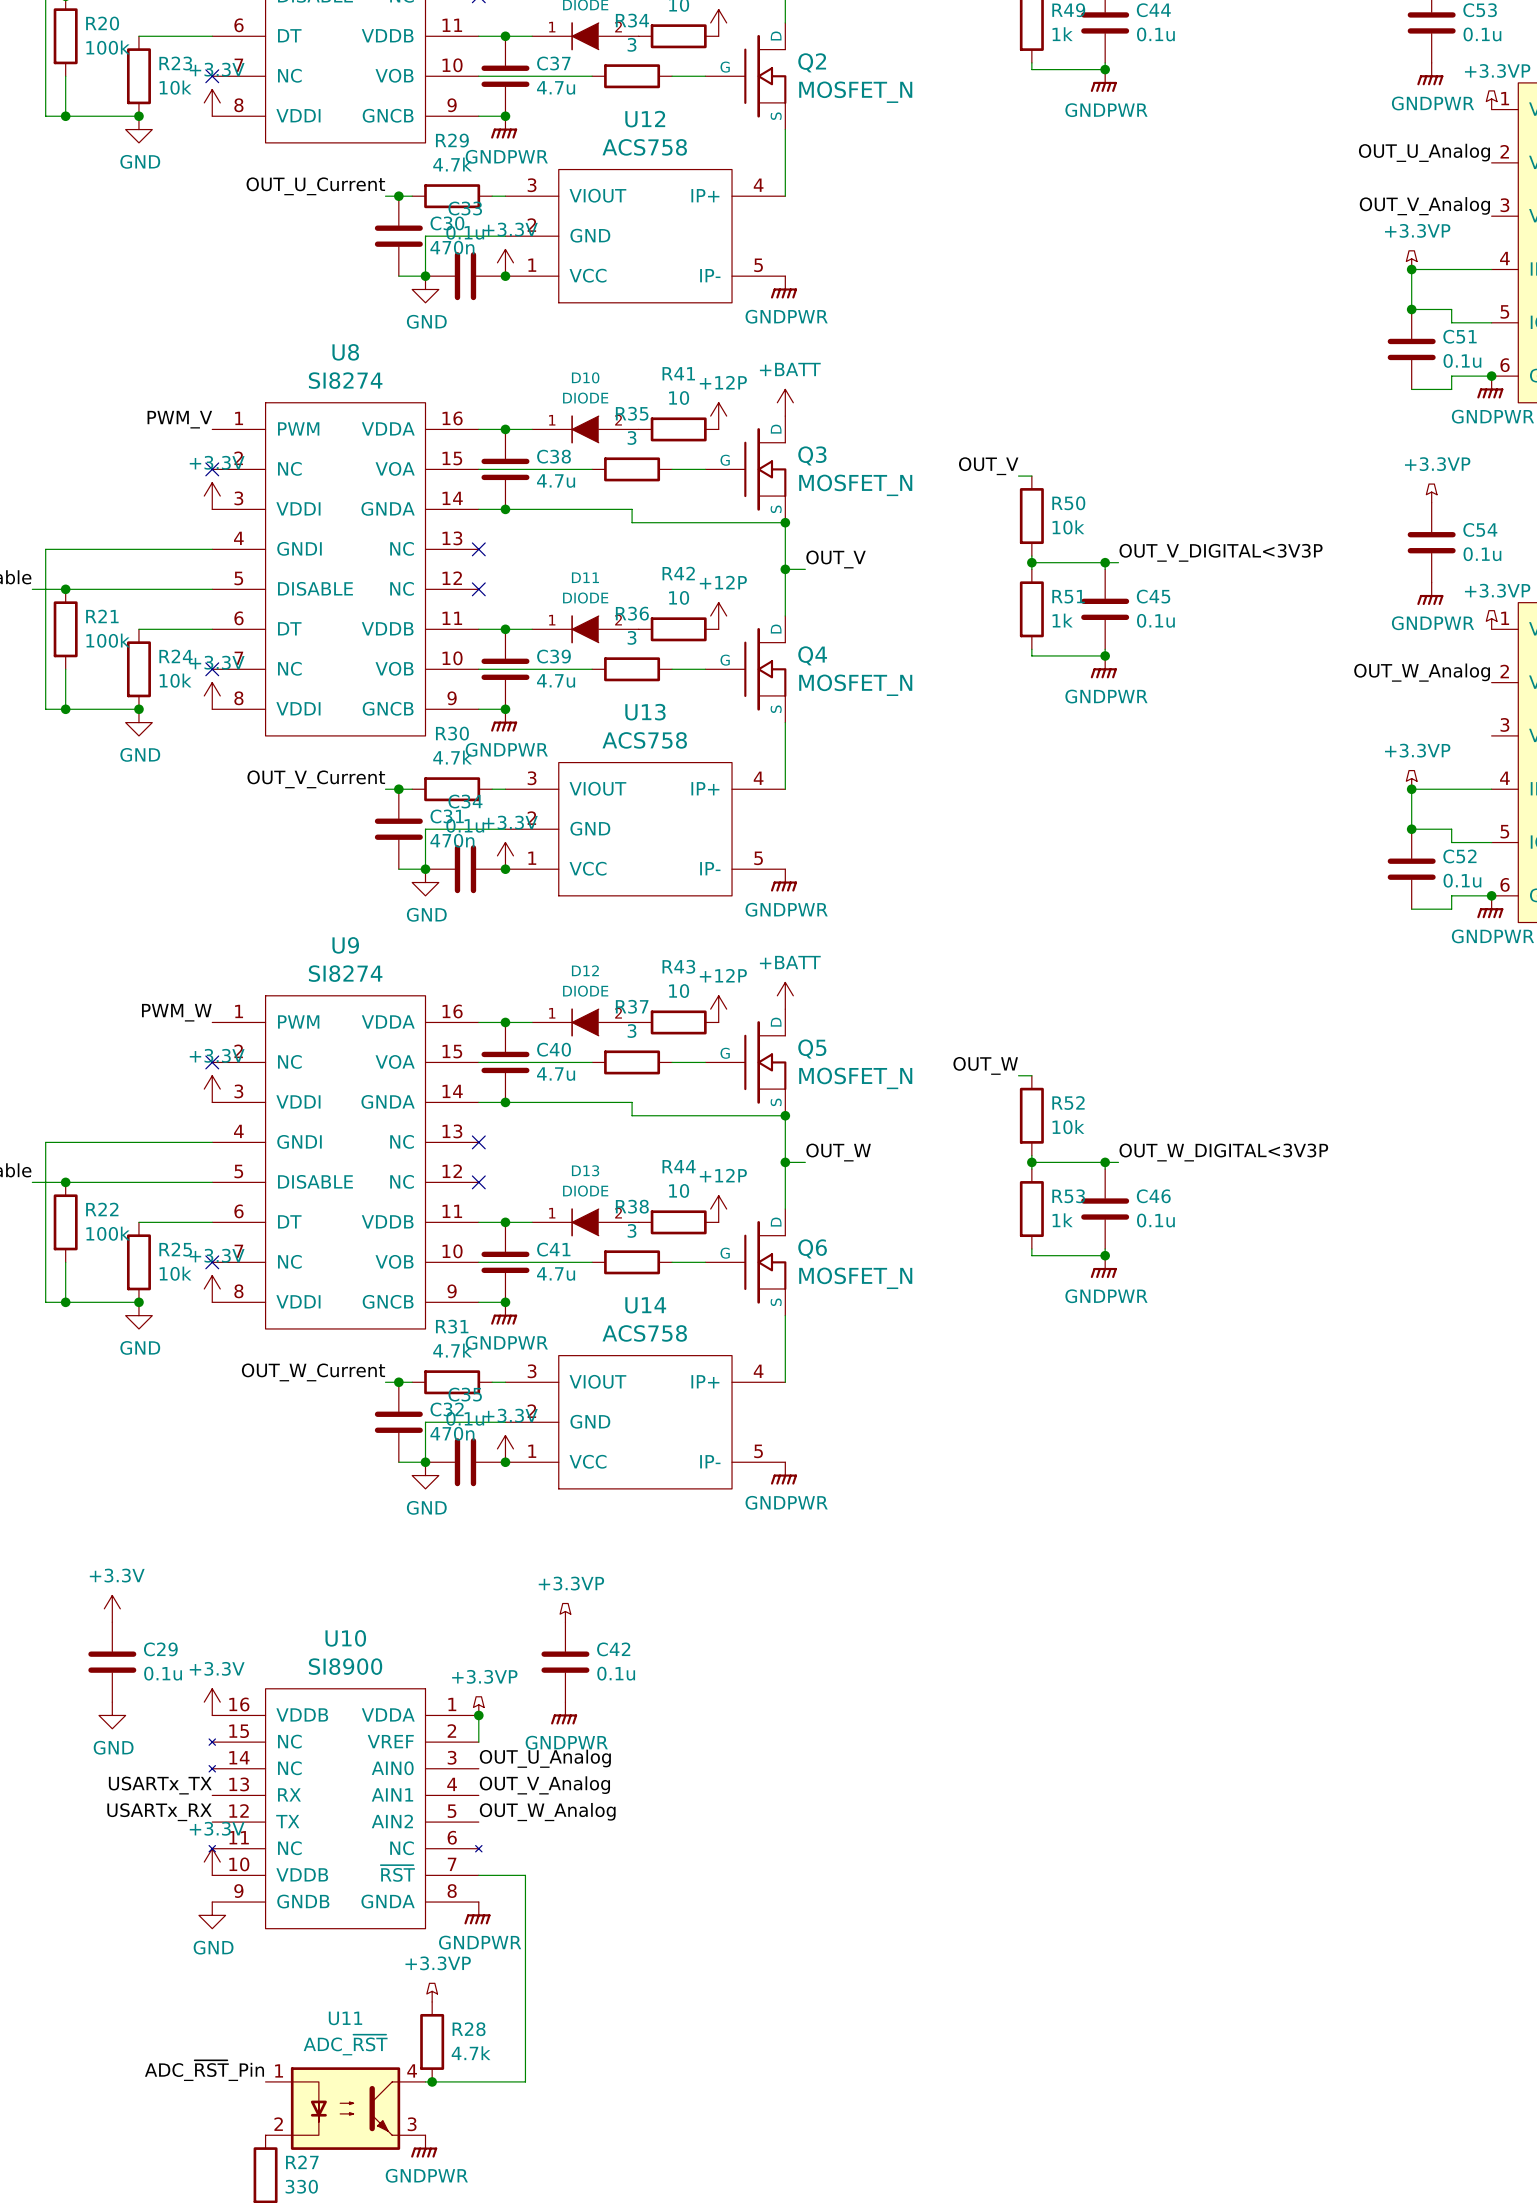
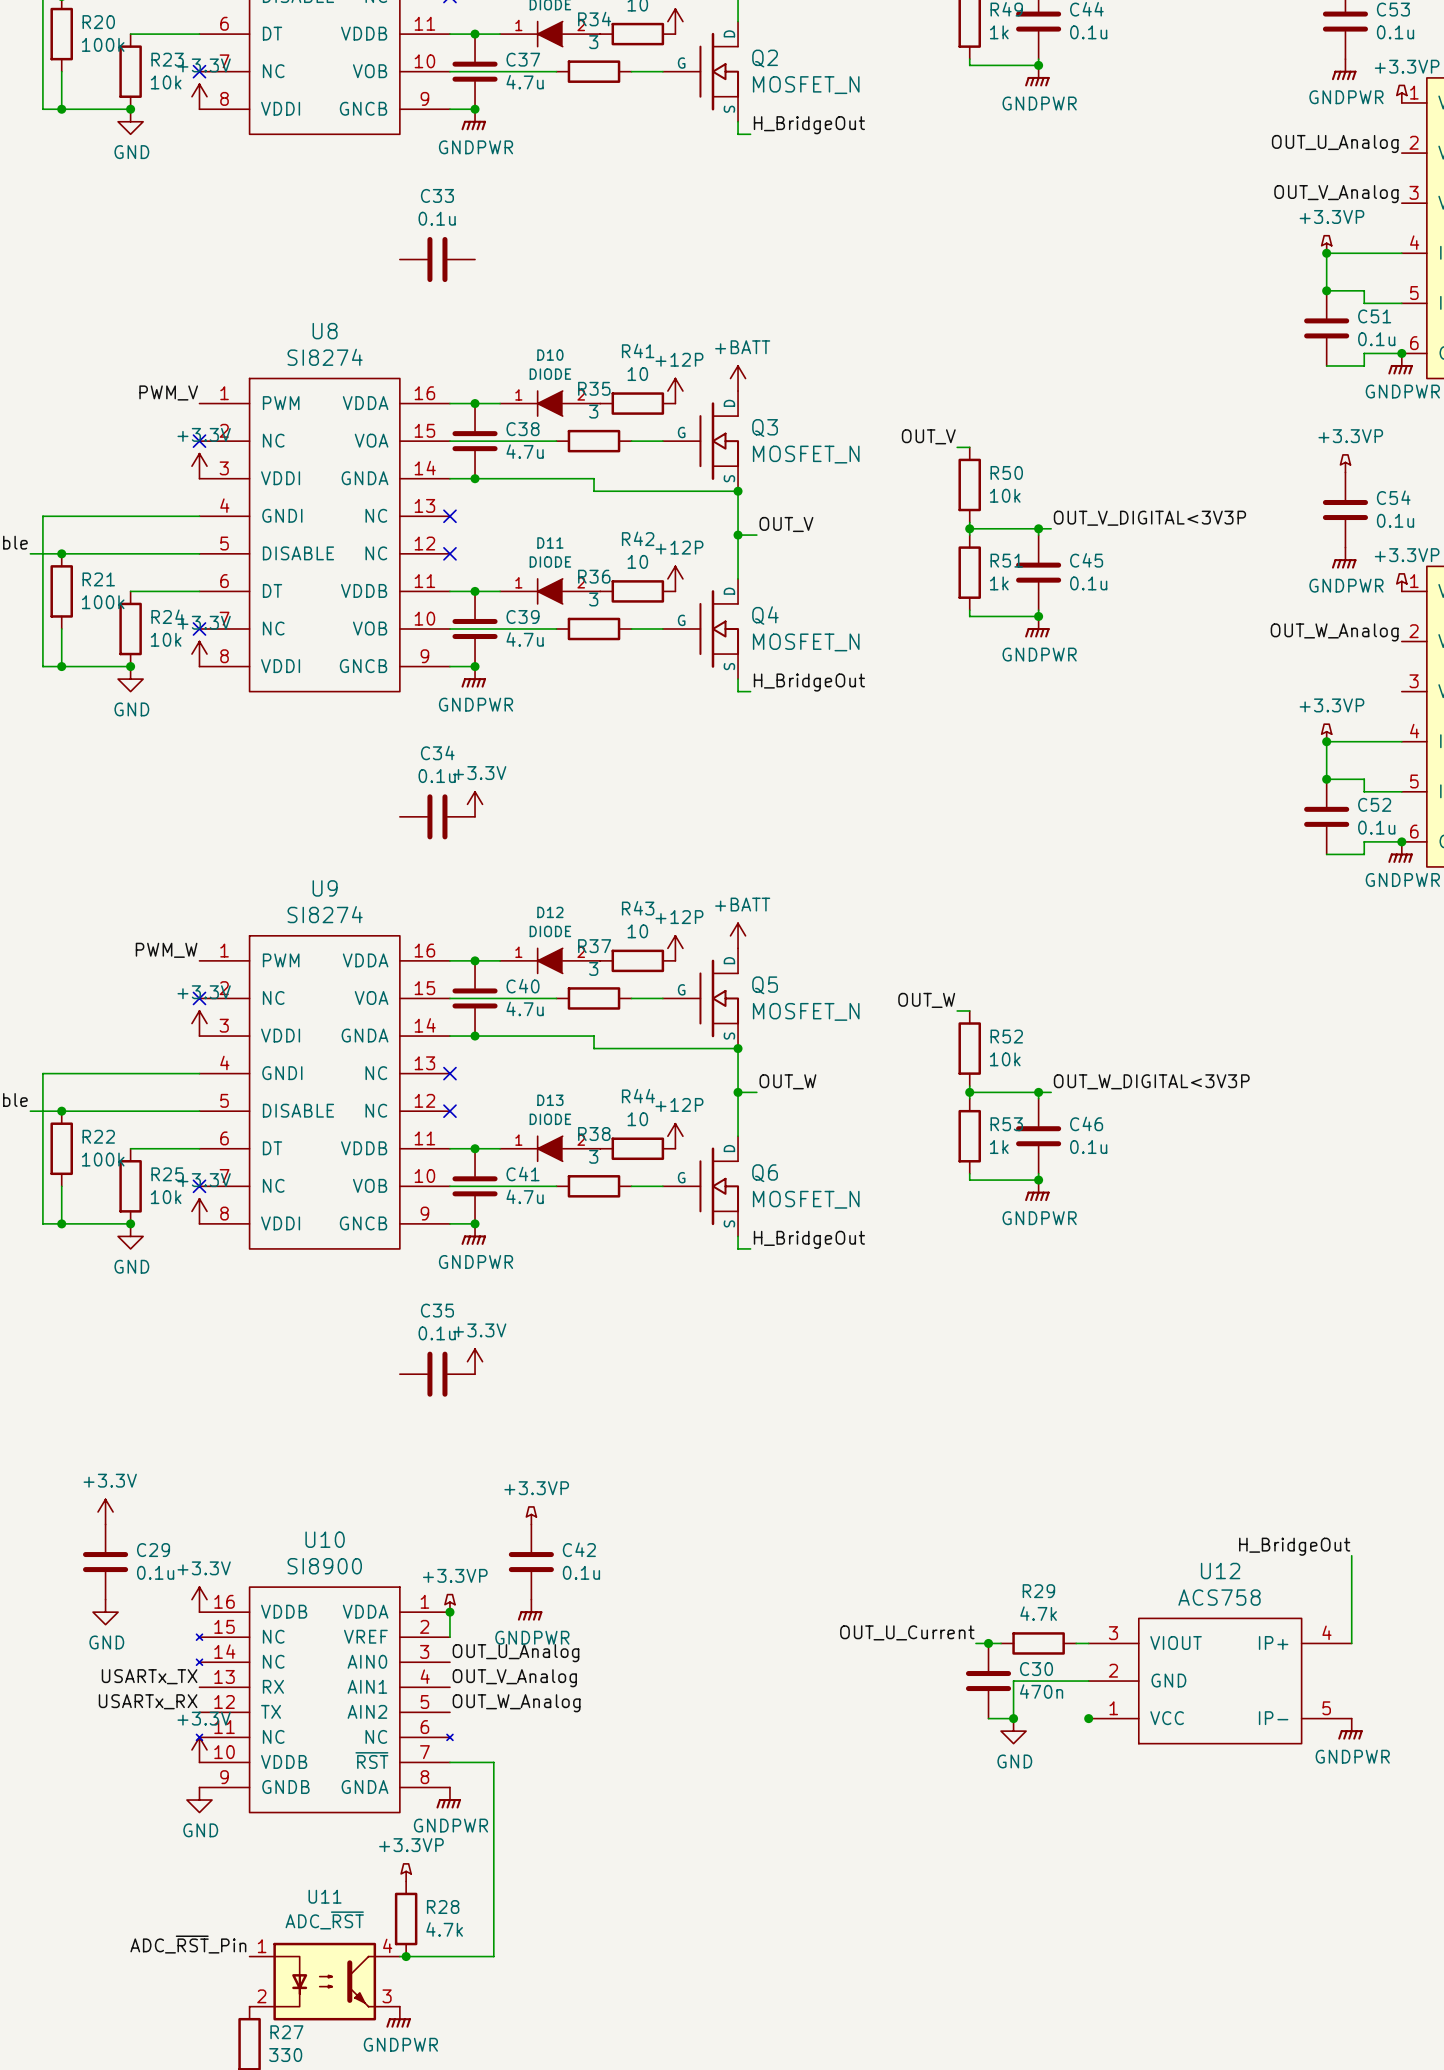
label: none -> H_BridgeOut (809, 125)
wire: (785, 142) (785, 196) -> (738, 134) (750, 134)
label: OUT_U_Current (315, 186) -> none
wire: (385, 196) (412, 196) -> none
junction: (398, 196) -> none
R29 position: (452, 196) -> (1038, 1643)
wire: (492, 196) (505, 196) -> none
C30 position: (398, 236) -> (988, 1681)
wire: (505, 236) (425, 236) (425, 276) (398, 276) -> none
U12 position: (645, 236) -> (1220, 1681)
power symbol: +3.3V (505, 262) -> none
junction: (425, 276) -> none
junction: (505, 276) -> none
power symbol: GNDPWR (783, 287) -> none
power symbol: GND (425, 289) -> none
label: none -> H_BridgeOut (809, 682)
wire: (785, 735) (785, 789) -> (738, 691) (750, 691)
label: OUT_V_Current (316, 779) -> none
wire: (385, 789) (412, 789) -> none
junction: (398, 789) -> none
R30: 4.7k (452, 789) -> none
wire: (492, 789) (505, 789) -> none
C31: 470n (398, 829) -> none
wire: (505, 829) (425, 829) (425, 869) (398, 869) -> none
U13: ACS758 (645, 829) -> none
junction: (425, 869) -> none
junction: (505, 869) -> none
power symbol: GNDPWR (783, 880) -> none
power symbol: GND (425, 882) -> none
label: none -> H_BridgeOut (809, 1239)
wire: (785, 1328) (785, 1382) -> (738, 1248) (750, 1248)
label: OUT_W_Current (313, 1372) -> none
wire: (385, 1382) (412, 1382) -> none
junction: (398, 1382) -> none
R31: 4.7k (452, 1382) -> none
wire: (492, 1382) (505, 1382) -> none
C32: 470n (398, 1422) -> none
wire: (505, 1422) (425, 1422) (425, 1462) (398, 1462) -> none
U14: ACS758 (645, 1422) -> none
junction: (425, 1462) -> none
junction: (505, 1462) -> none
power symbol: GNDPWR (783, 1473) -> none
power symbol: GND (425, 1475) -> none
label: none -> H_BridgeOut (1294, 1546)
wire: none -> (1351, 1555) (1351, 1643)
label: none -> OUT_U_Current (907, 1632)
wire: none -> (975, 1643) (1001, 1643)
junction: none -> (988, 1643)
wire: none -> (1076, 1643) (1088, 1643)
wire: none -> (1088, 1681) (1013, 1681) (1013, 1718) (988, 1718)
junction: none -> (1013, 1718)
junction: none -> (1088, 1718)
power symbol: none -> GNDPWR (1350, 1729)
power symbol: none -> GND (1013, 1731)

